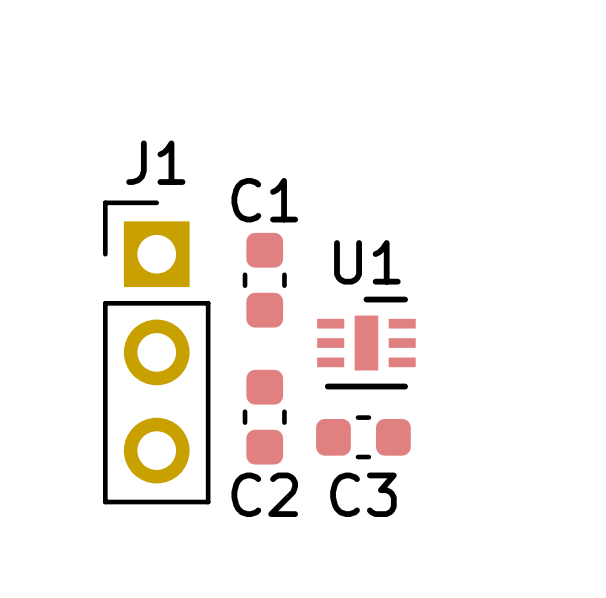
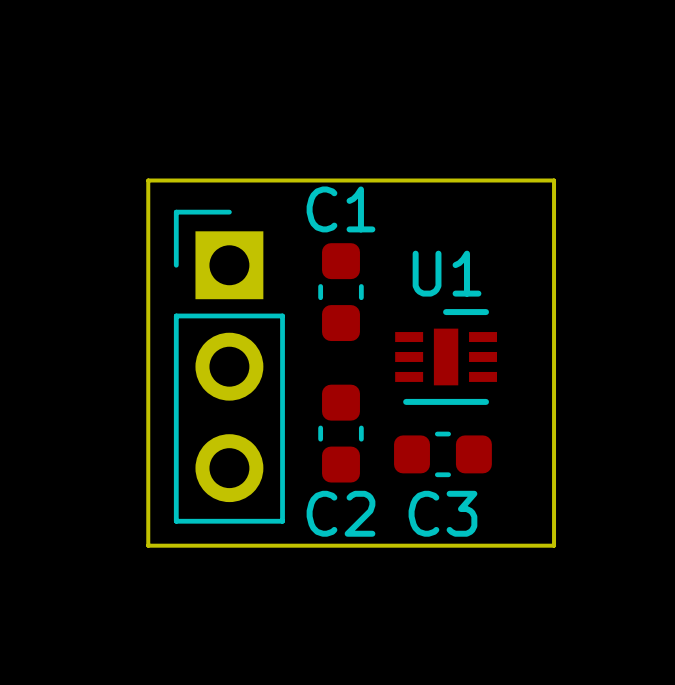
J1 name: J1 (155, 162) -> none
board edge: none -> (148, 180) (554, 180) (554, 545) (148, 545) (148, 180)

